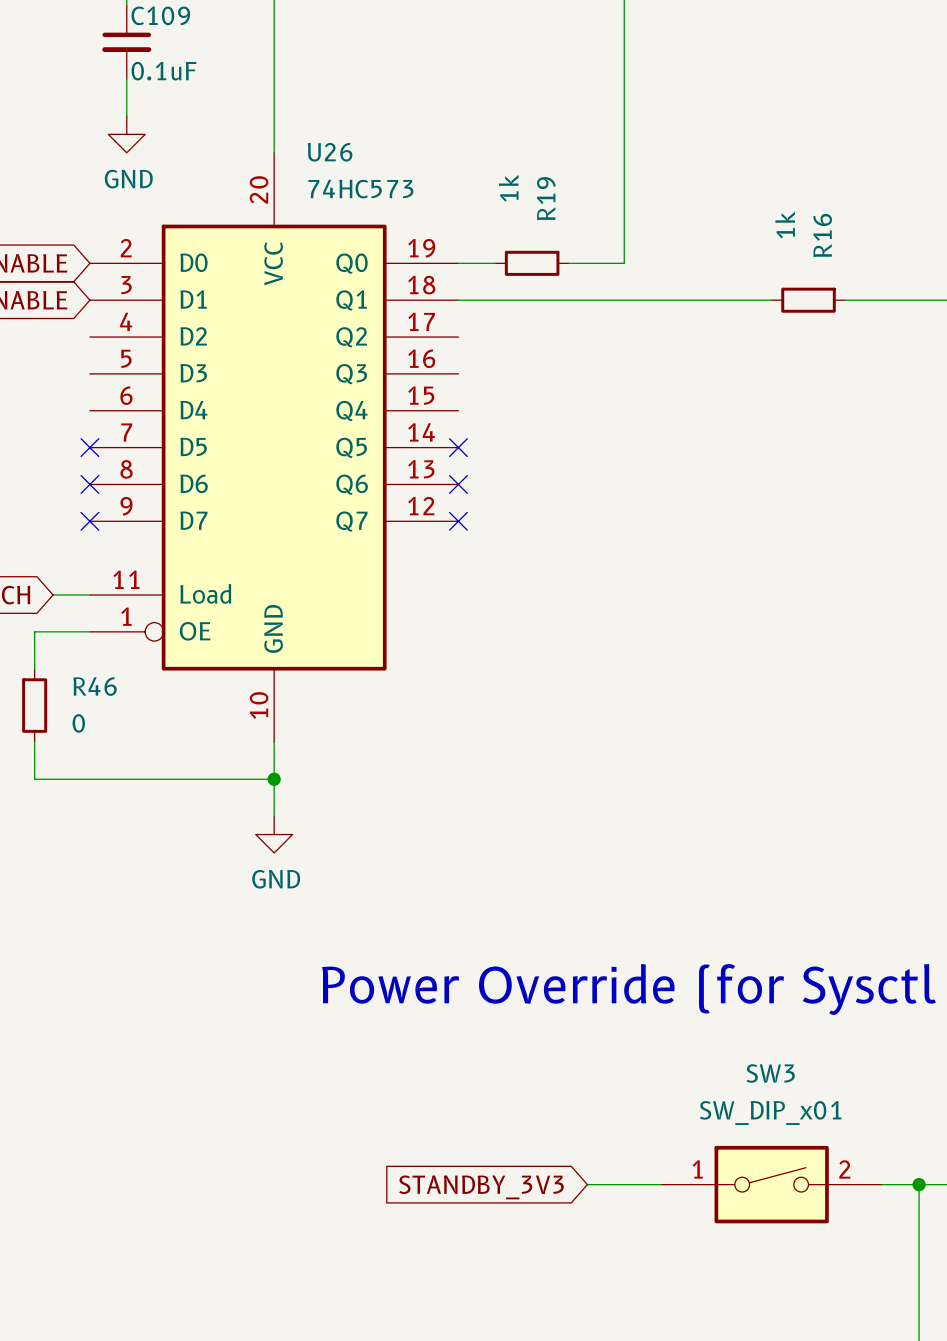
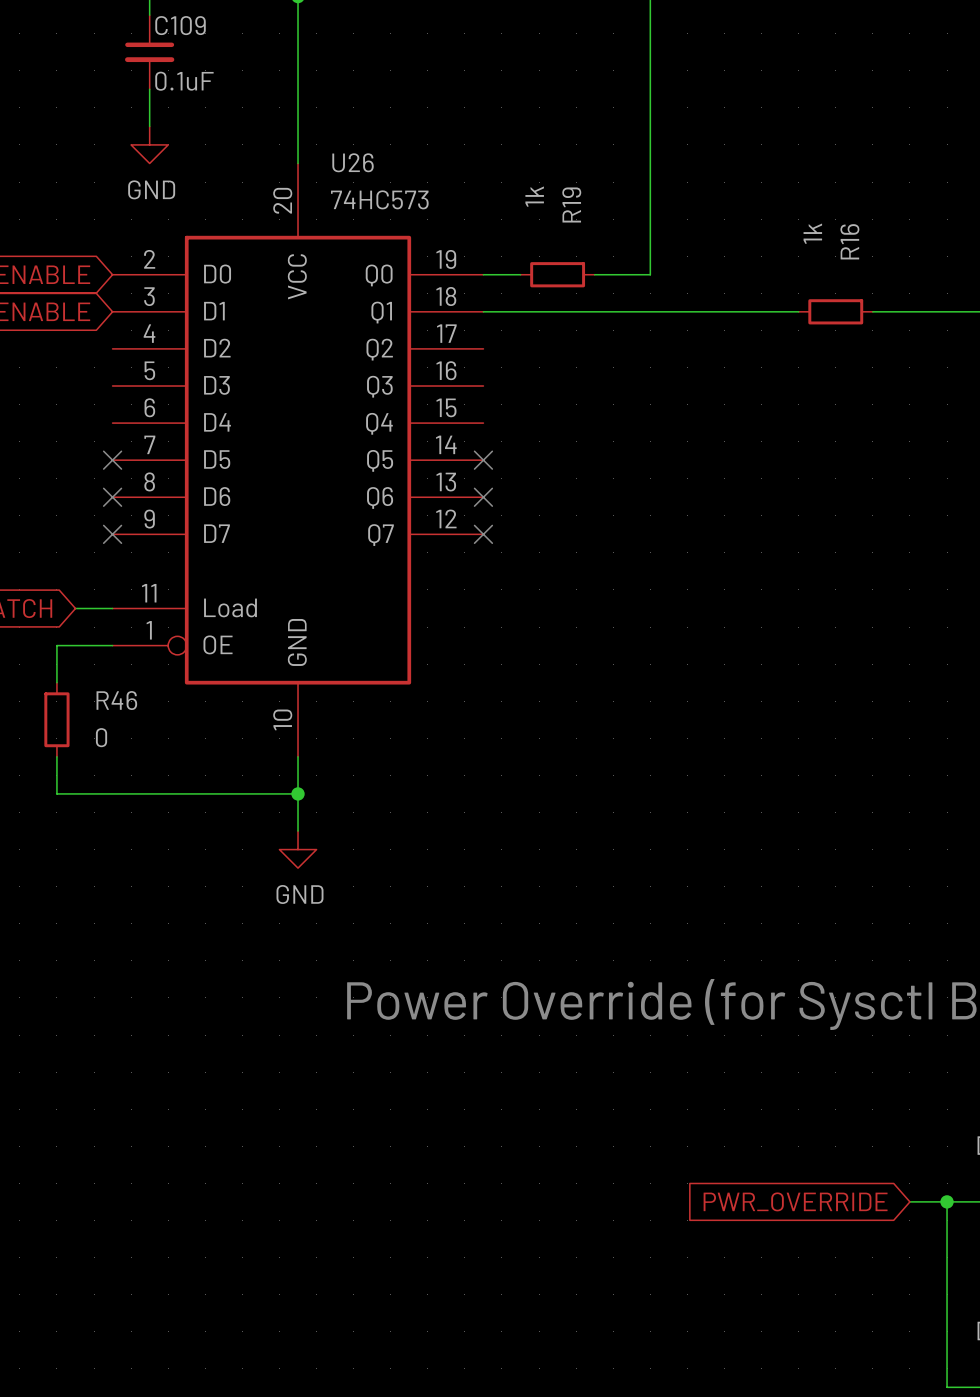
wire: (587, 1184) (661, 1184) -> none
SW3: SW_DIP_x01 (771, 1184) -> none
global label: STANDBY_3V3 (481, 1187) -> none
global label: none -> PWR_OVERRIDE (795, 1201)

